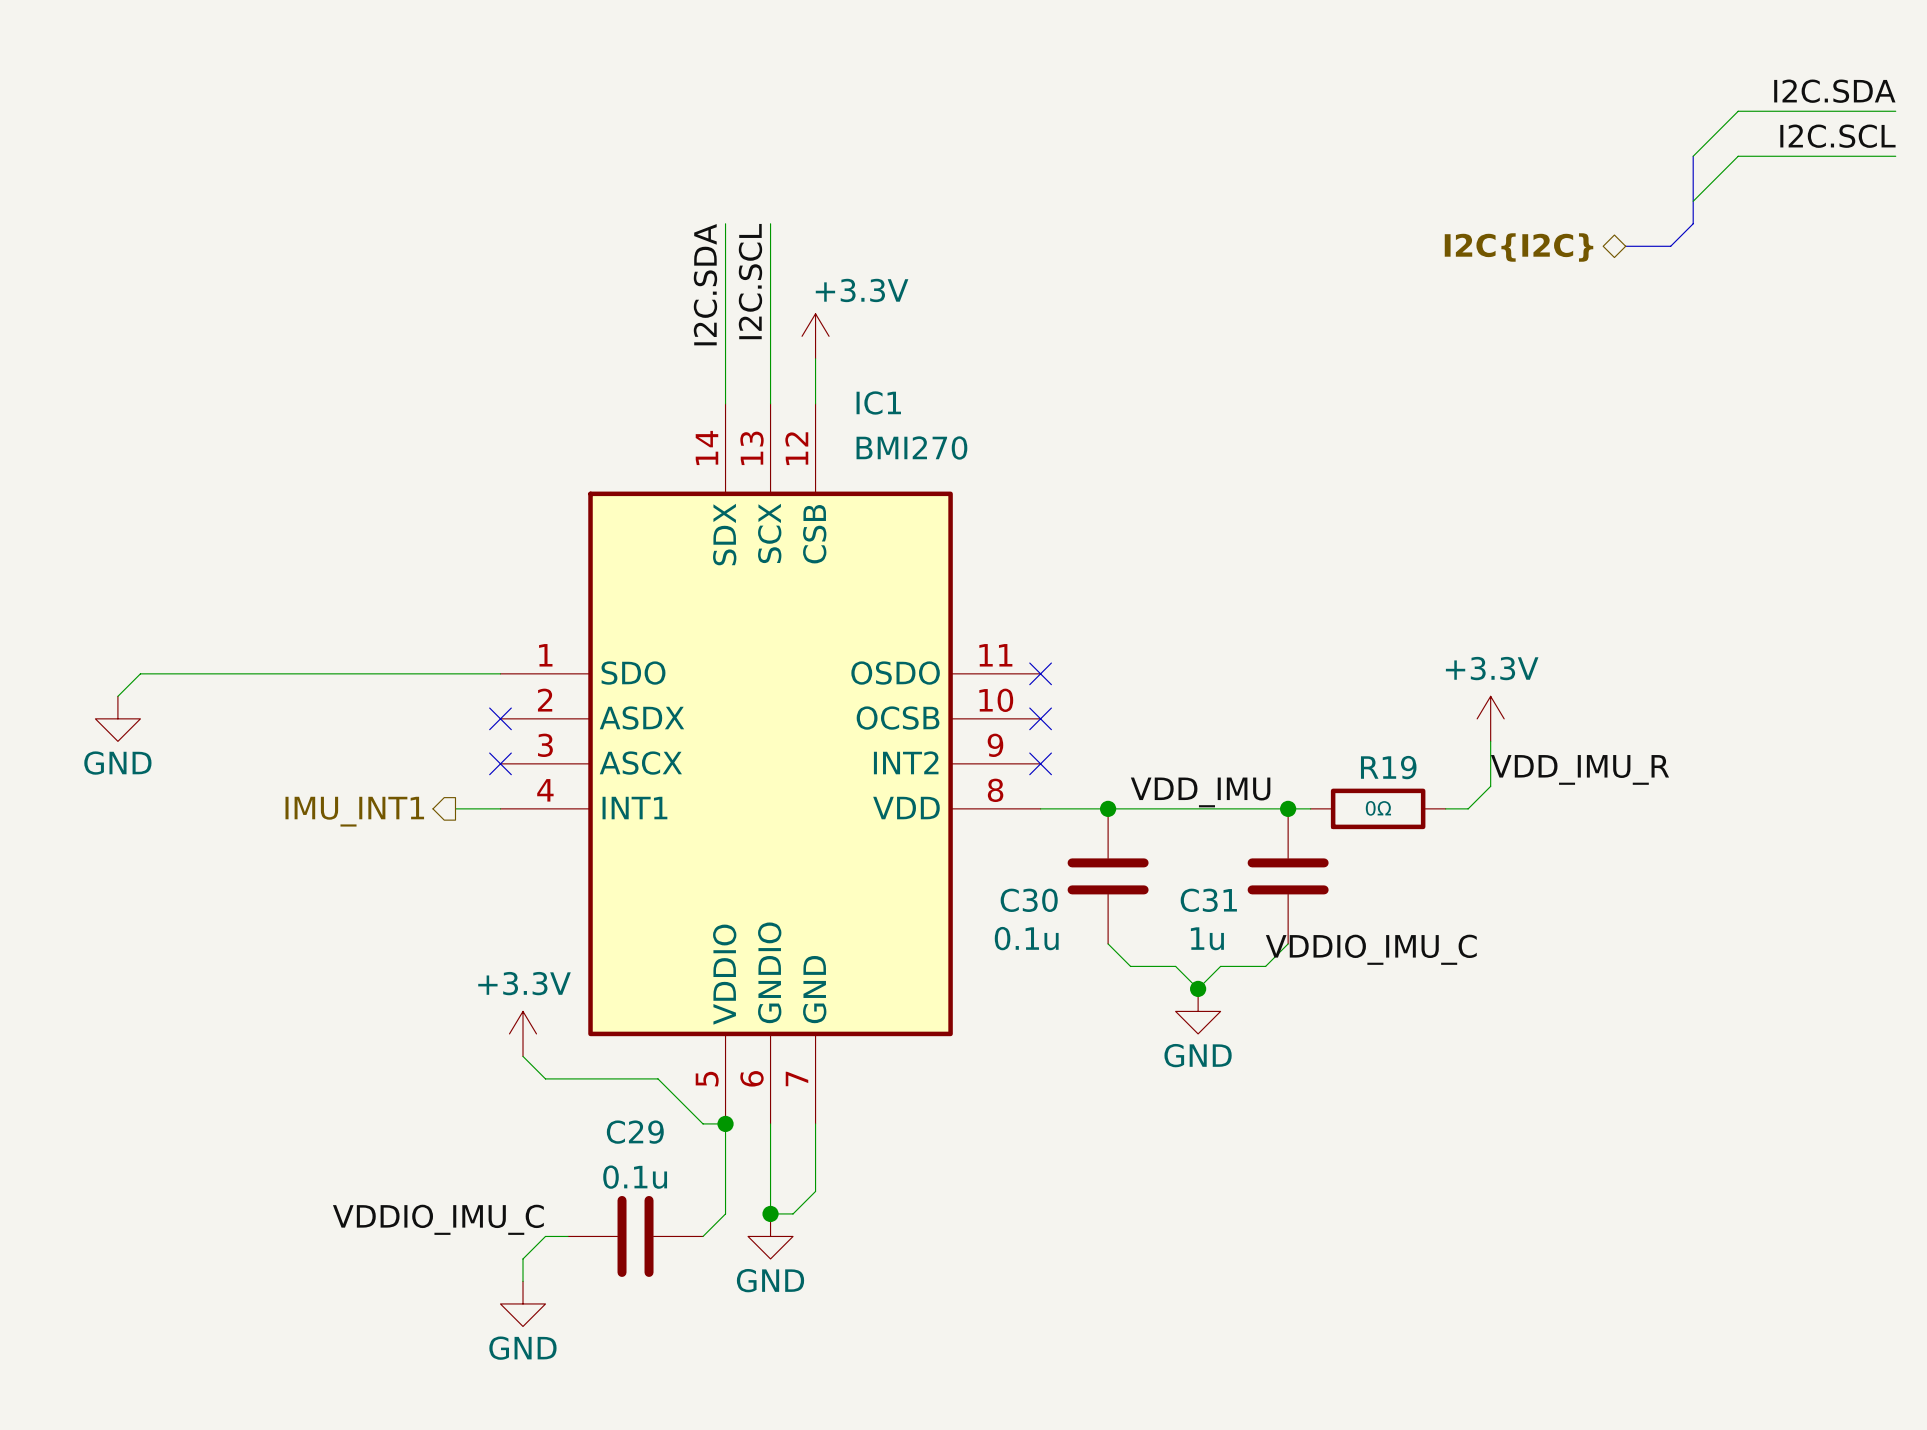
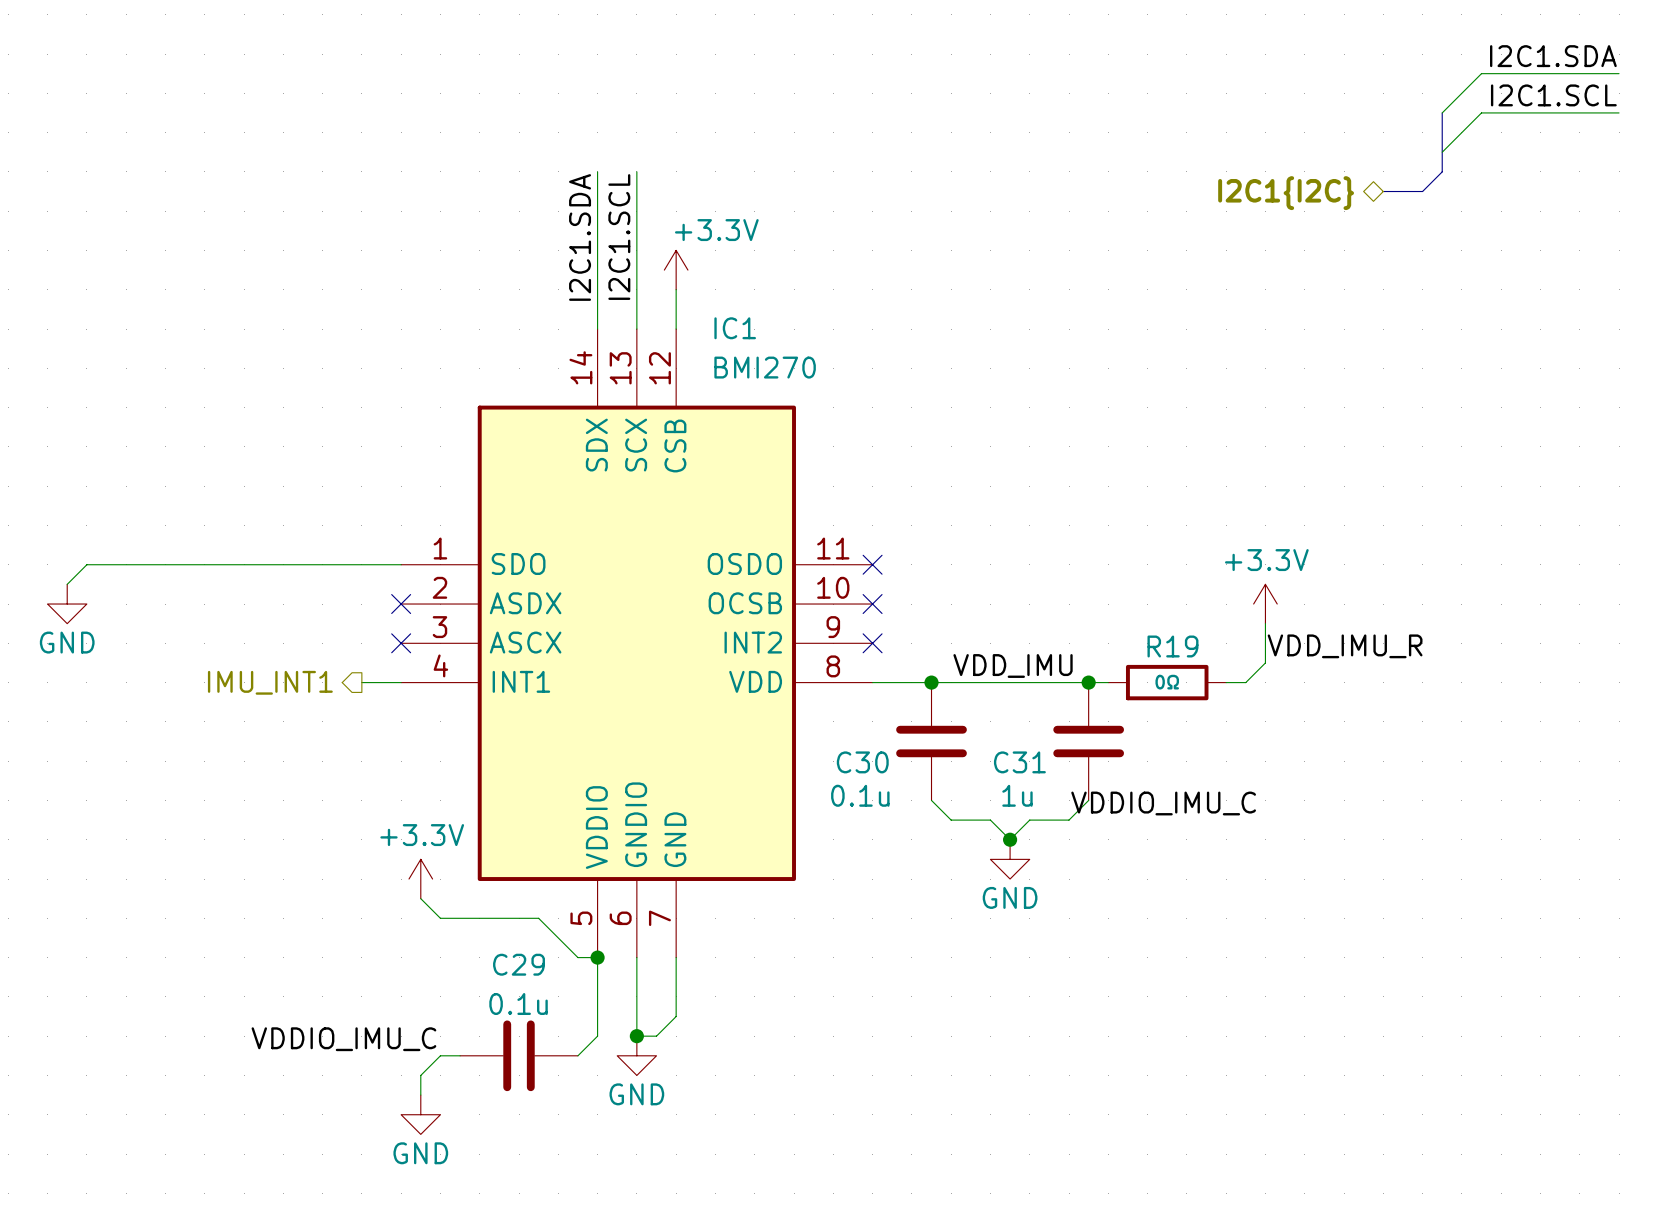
label: I2C.SDA (1834, 91) -> I2C1.SDA (1553, 56)
label: I2C.SCL (1837, 136) -> I2C1.SCL (1553, 95)
hierarchical label: I2C{I2C} (1519, 247) -> I2C1{I2C} (1286, 193)
label: I2C.SCL (750, 281) -> I2C1.SCL (619, 237)
label: I2C.SDA (705, 284) -> I2C1.SDA (580, 237)

